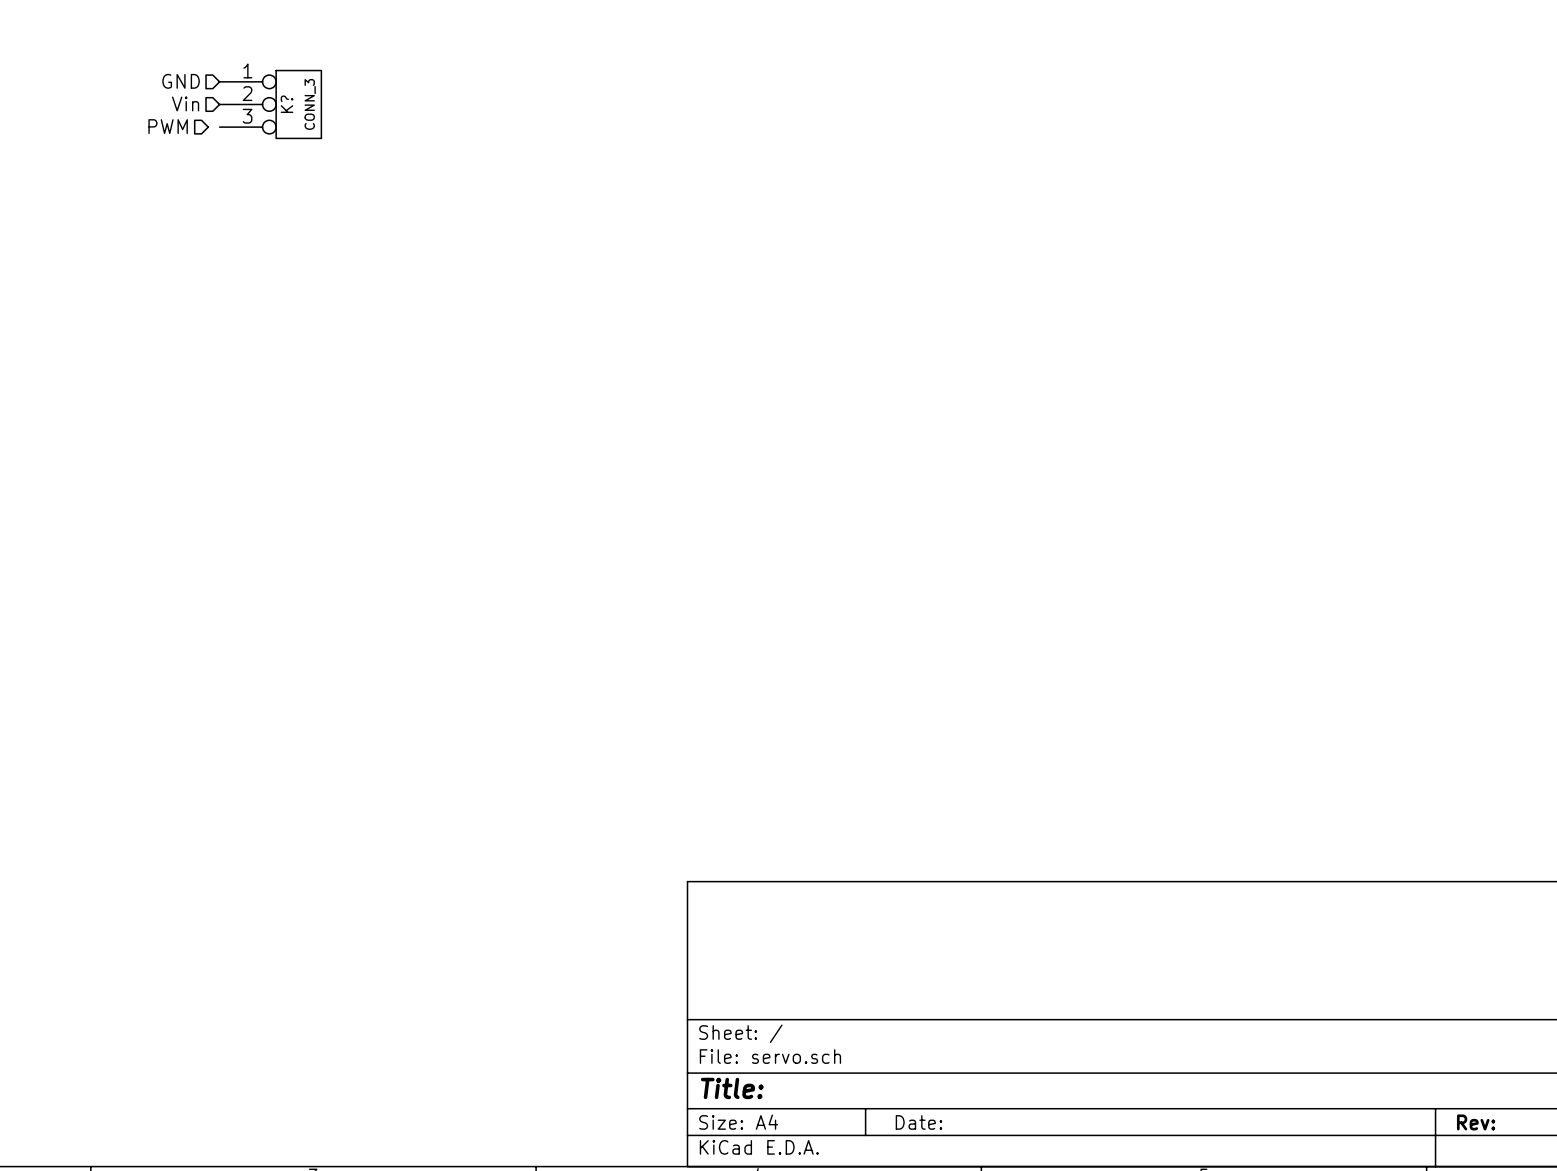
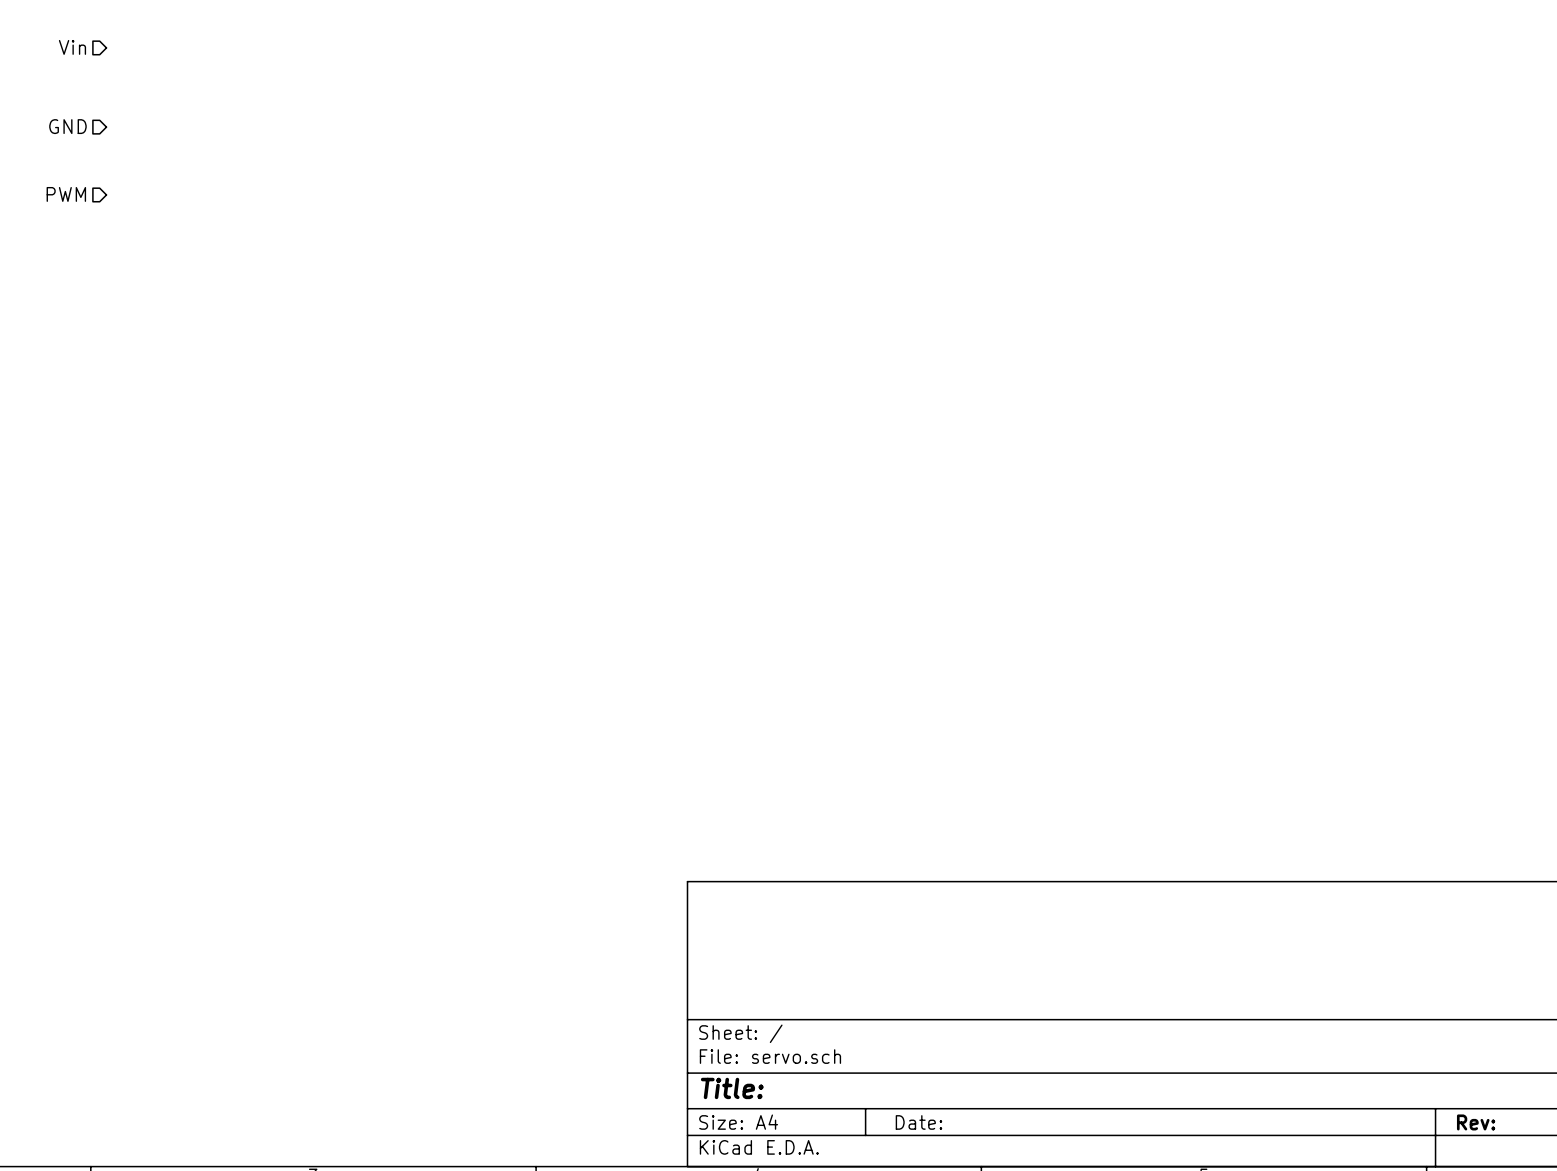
hierarchical label position: GND (181, 81) -> GND (67, 126)
hierarchical label position: Vin (185, 103) -> Vin (72, 47)
K?: CONN_3 (270, 104) -> none
hierarchical label position: PWM (168, 126) -> PWM (66, 194)

